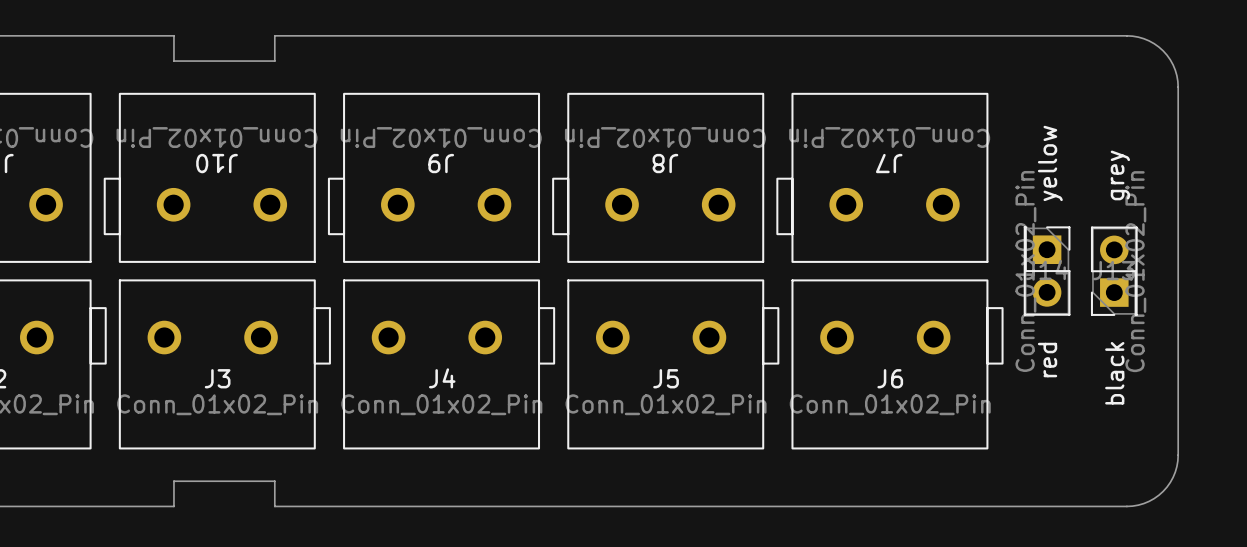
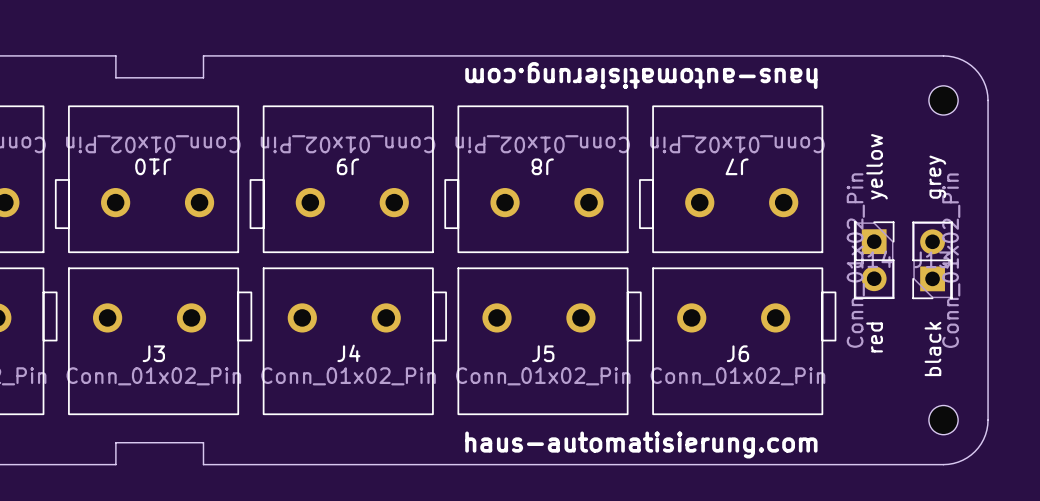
text: none -> haus-automatisierung.com (641, 75)
part: none -> (943, 100)
part: none -> (943, 420)
text: none -> haus-automatisierung.com (641, 444)

